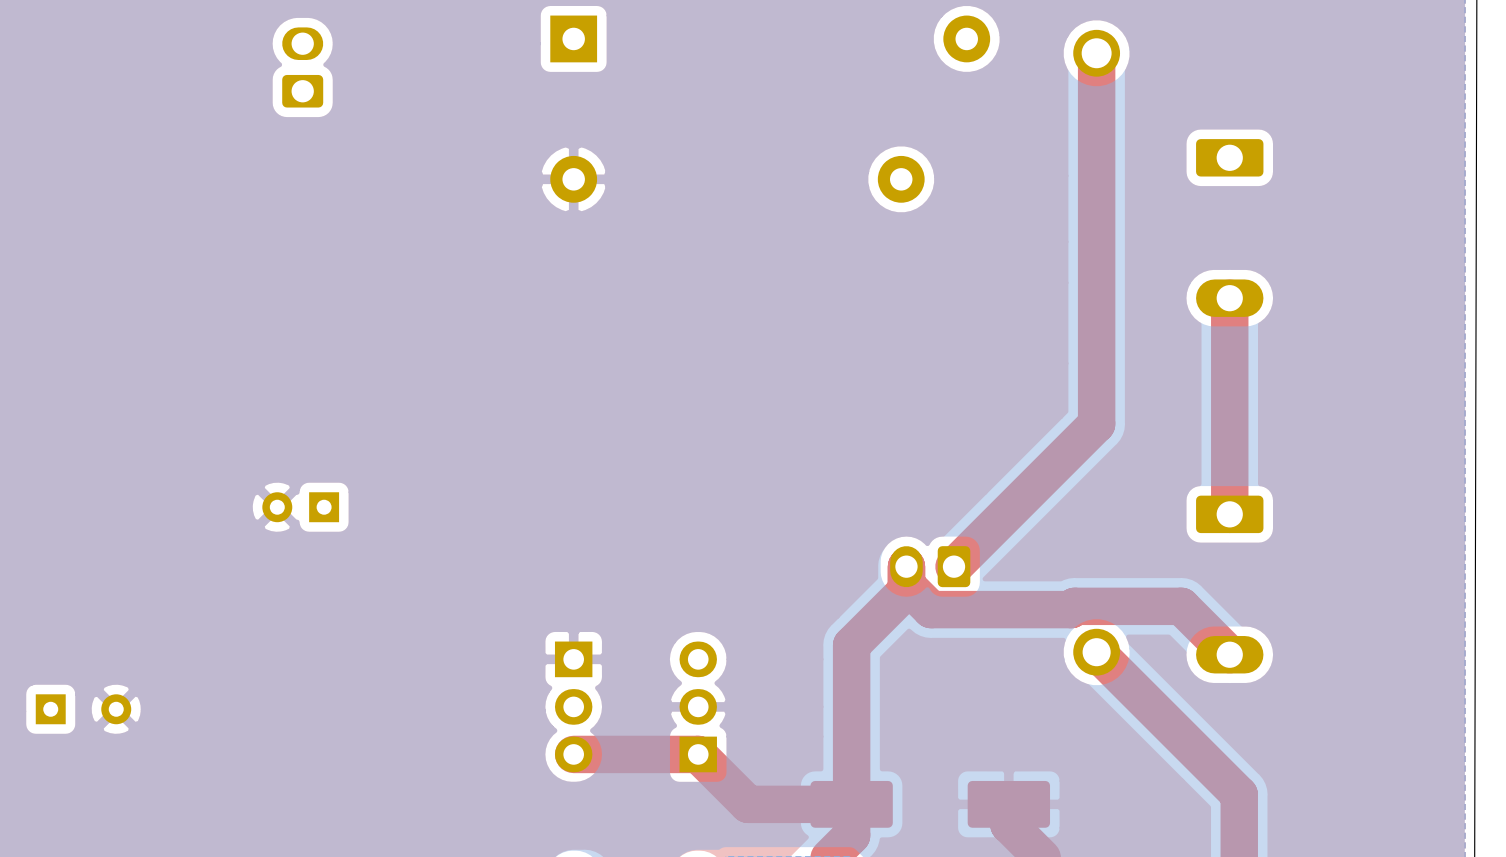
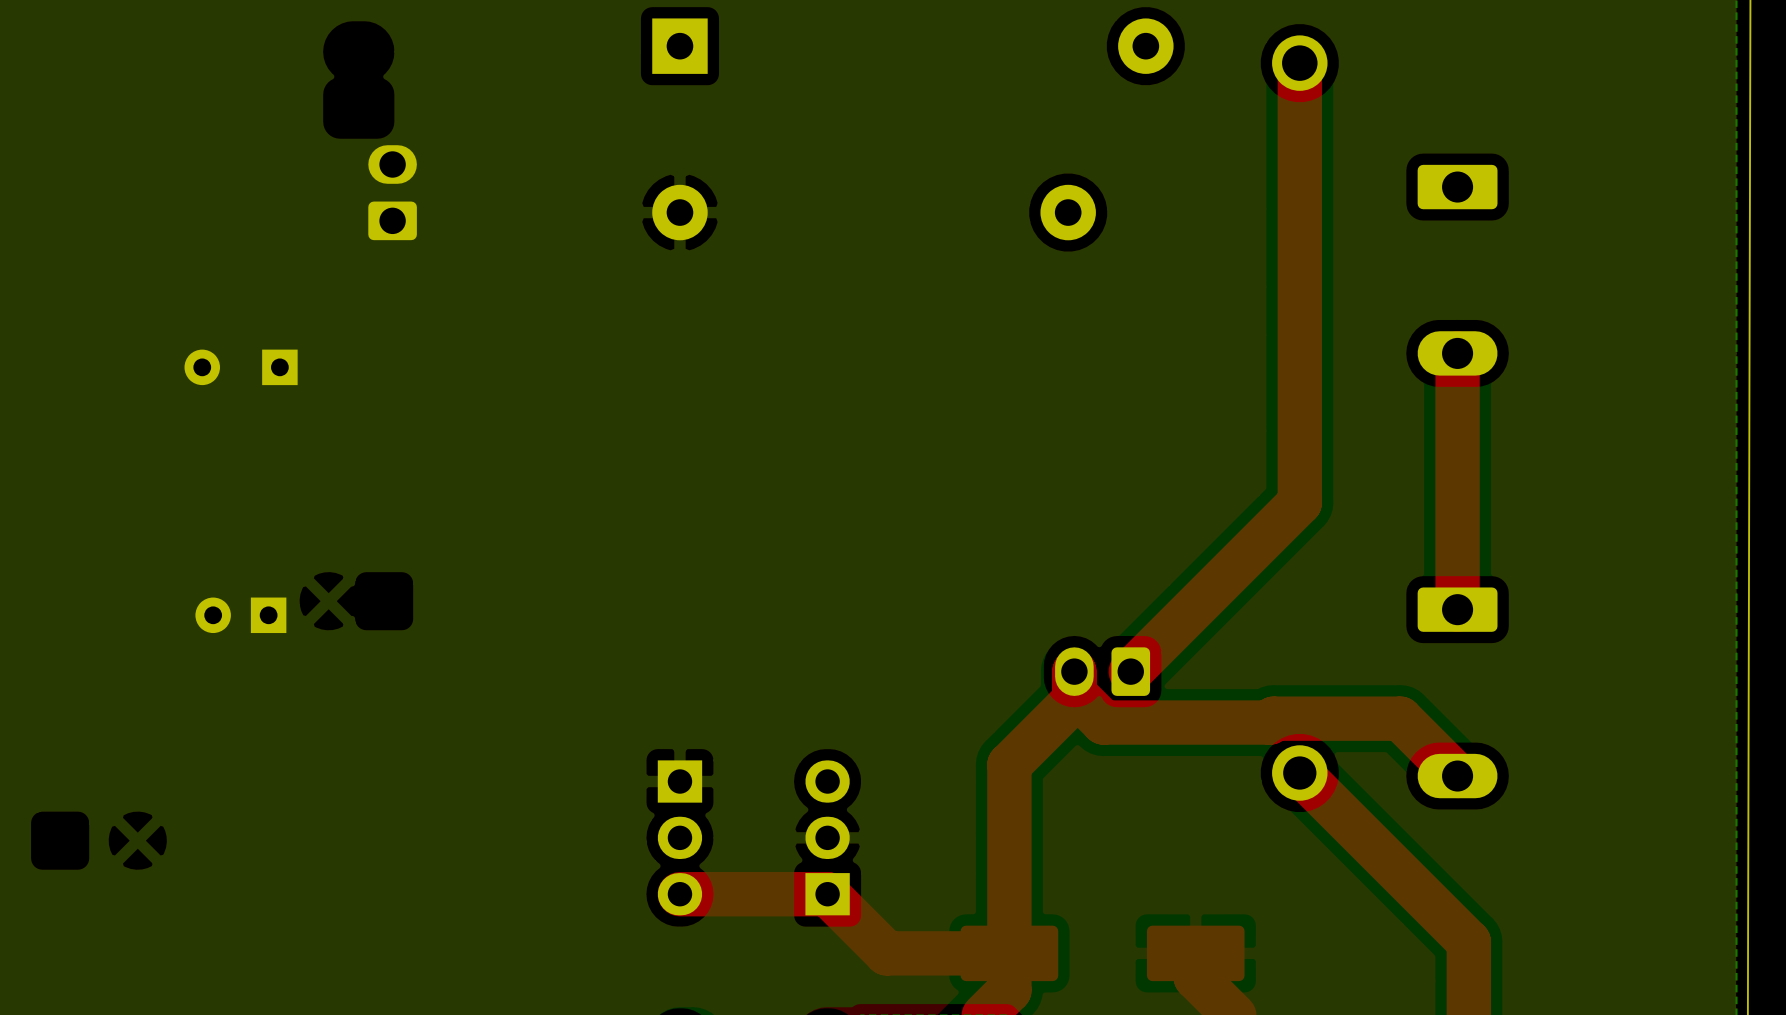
part position: (302, 67) -> (392, 192)
part position: (300, 507) -> (240, 615)
part rotation: 0° (83, 709) -> 180° (241, 367)
part position: (83, 709) -> (241, 367)

